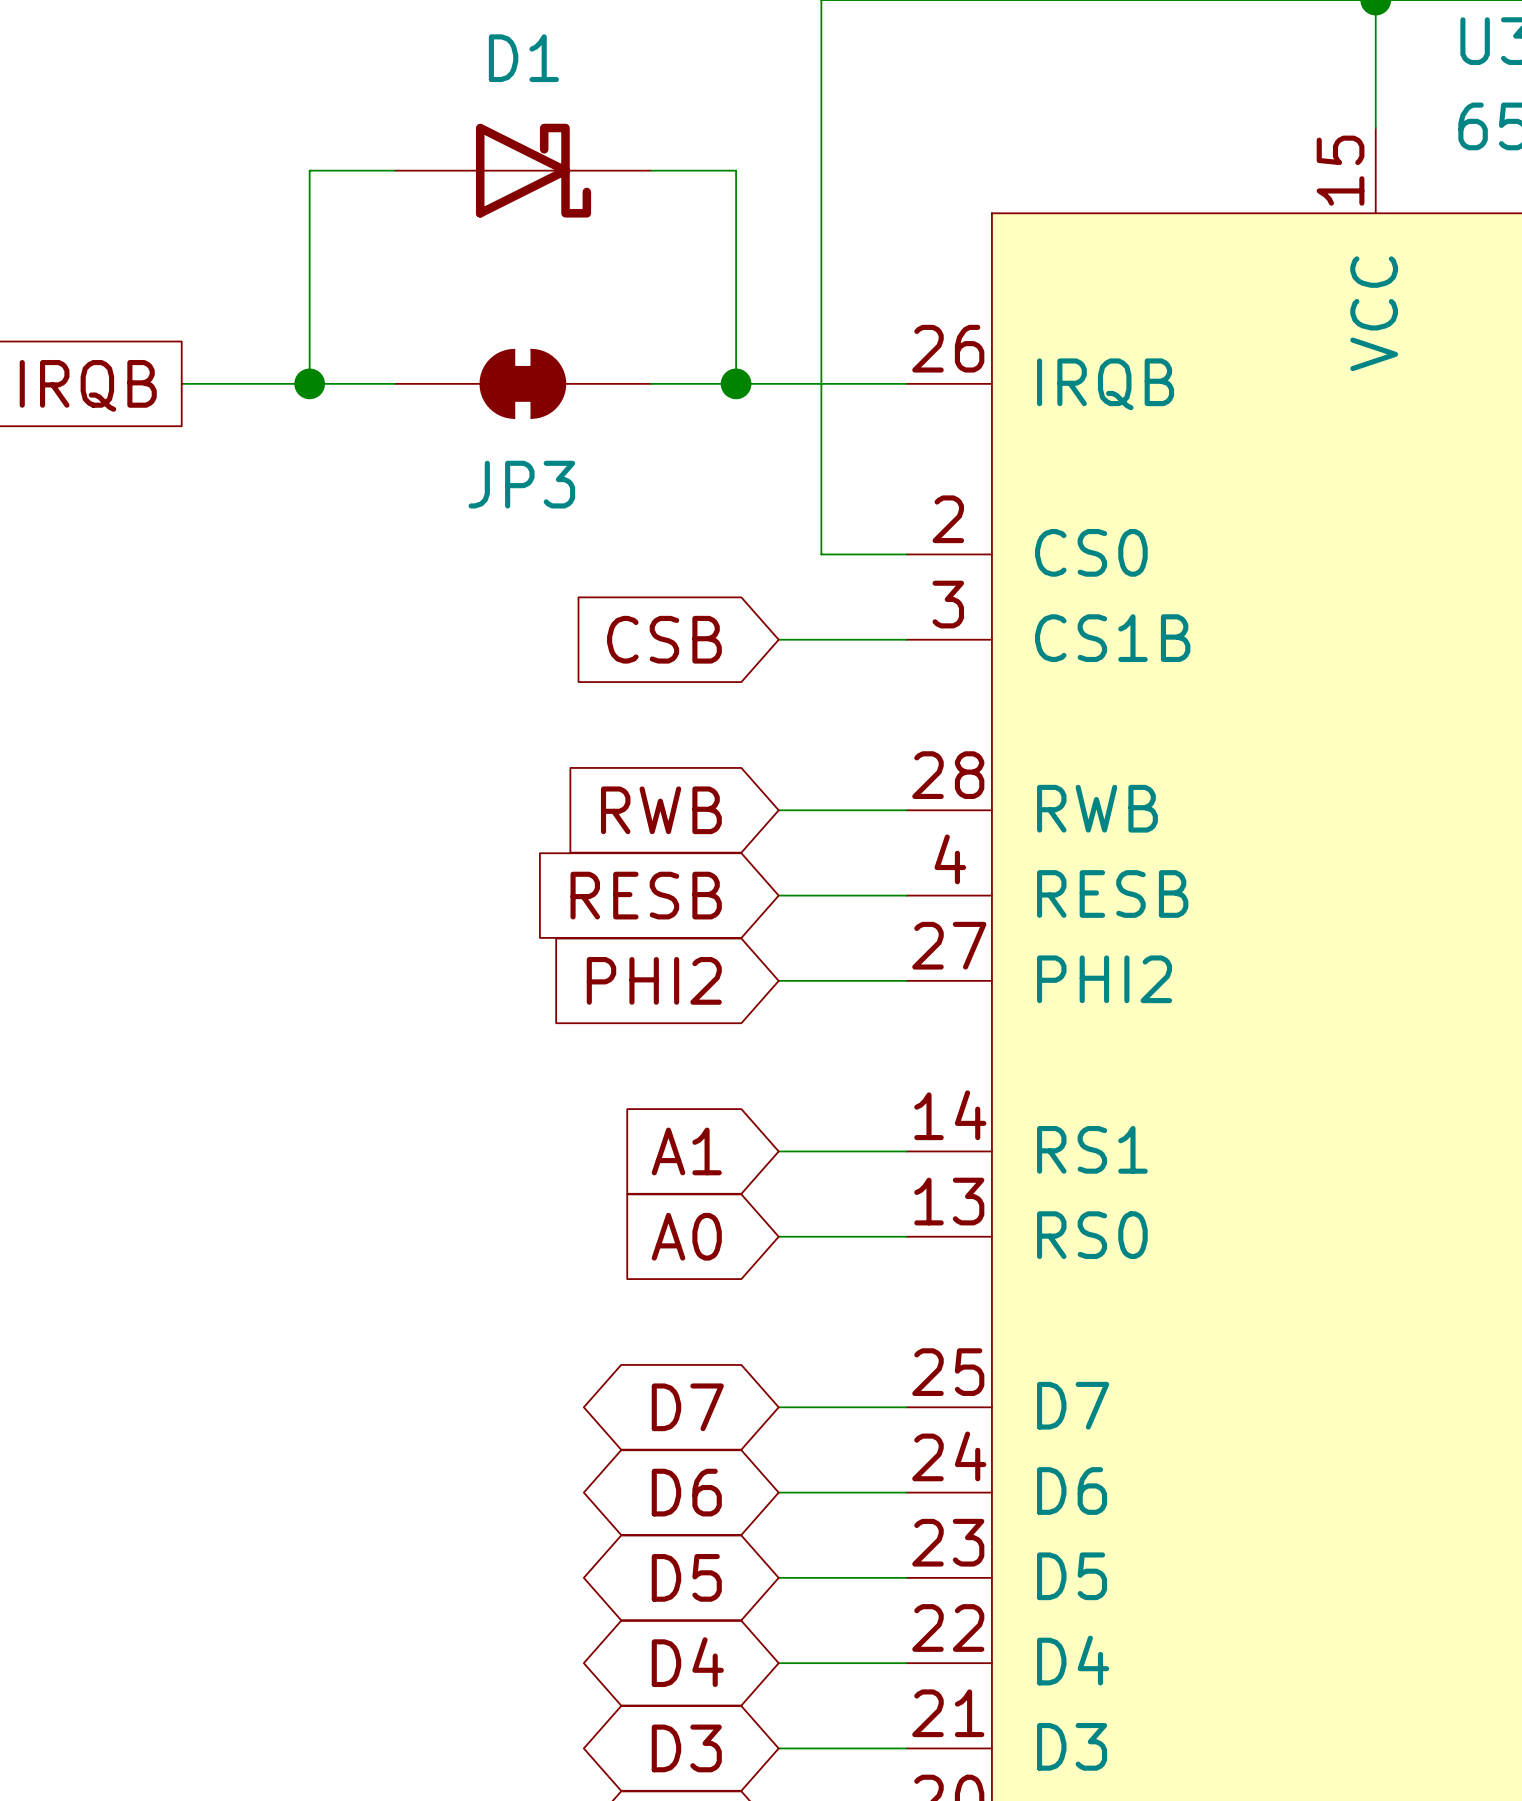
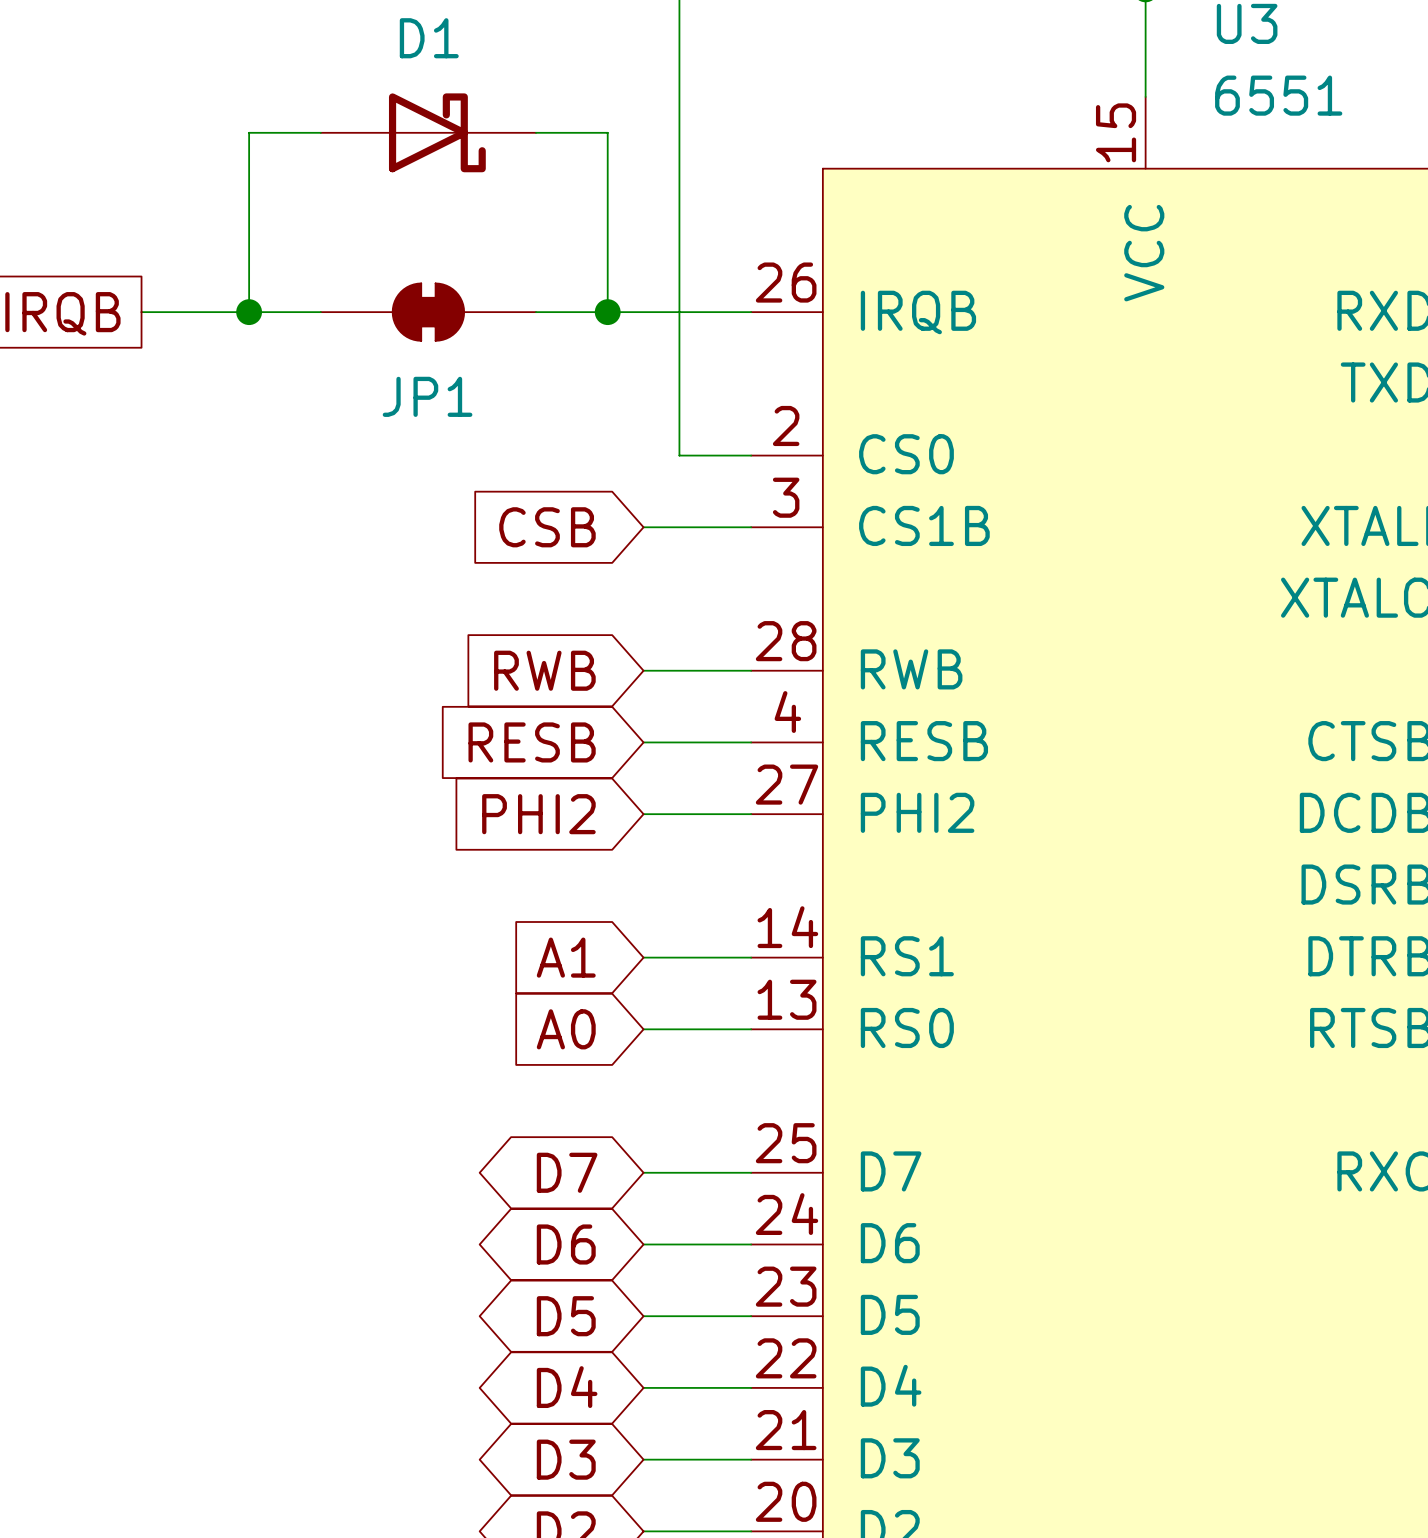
JP3 name: JP3 (521, 484) -> JP1 (427, 396)

